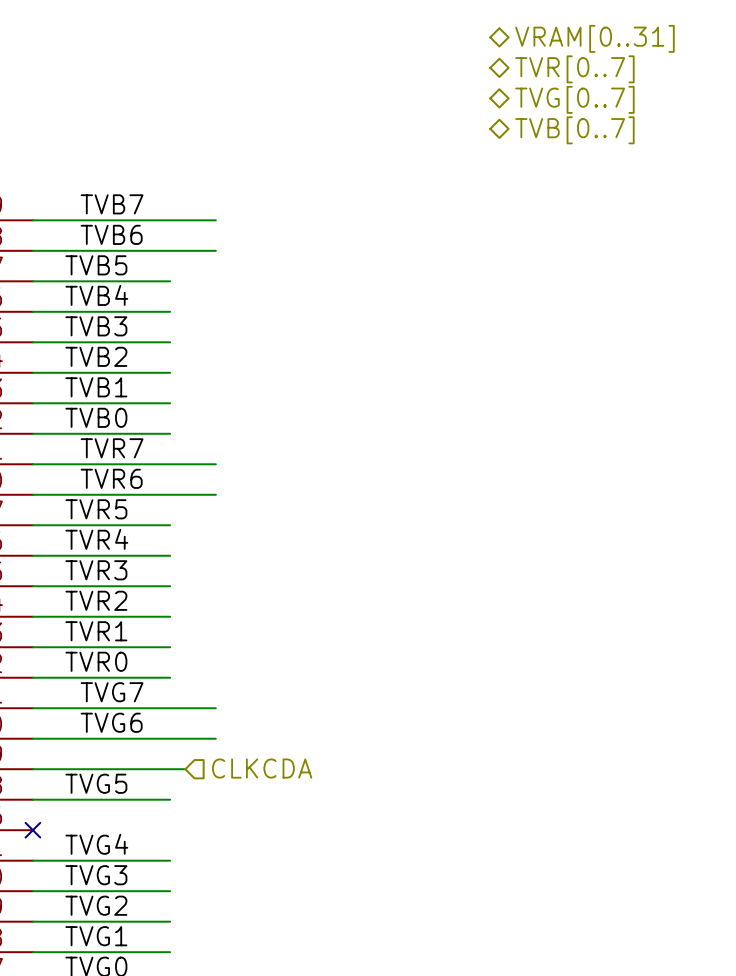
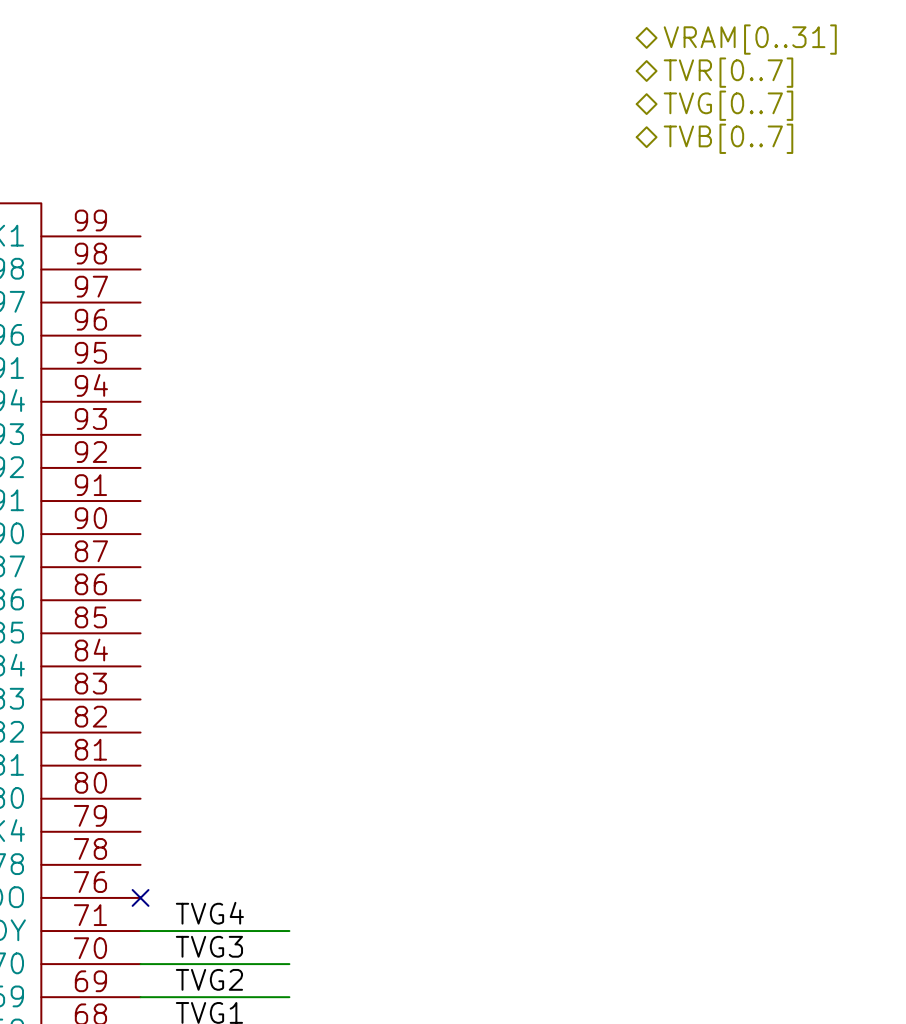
label: TVB7 (112, 204) -> none
wire: (32, 220) (215, 220) -> none
label: TVB6 (111, 234) -> none
wire: (32, 250) (215, 250) -> none
label: TVB5 (96, 265) -> none
wire: (32, 281) (170, 281) -> none
label: TVB4 (96, 295) -> none
wire: (32, 311) (170, 311) -> none
label: TVB3 (96, 326) -> none
wire: (32, 342) (170, 342) -> none
label: TVB2 (96, 356) -> none
wire: (32, 372) (170, 372) -> none
label: TVB1 (96, 387) -> none
wire: (32, 403) (170, 403) -> none
label: TVB0 (96, 417) -> none
wire: (32, 433) (170, 433) -> none
label: TVR7 (112, 448) -> none
wire: (32, 464) (215, 464) -> none
label: TVR6 (111, 478) -> none
wire: (32, 494) (215, 494) -> none
label: TVR5 (96, 509) -> none
wire: (32, 525) (170, 525) -> none
label: TVR4 (96, 539) -> none
wire: (32, 555) (170, 555) -> none
label: TVR3 (96, 570) -> none
wire: (32, 586) (170, 586) -> none
label: TVR2 (96, 600) -> none
wire: (32, 616) (170, 616) -> none
label: TVR1 (96, 631) -> none
wire: (32, 647) (170, 647) -> none
label: TVR0 (96, 661) -> none
wire: (32, 677) (170, 677) -> none
label: TVG7 (112, 692) -> none
wire: (32, 708) (215, 708) -> none
label: TVG6 (111, 722) -> none
wire: (32, 738) (215, 738) -> none
hierarchical label: CLKCDA (262, 768) -> none
wire: (32, 769) (185, 769) -> none
label: TVG5 (96, 783) -> none
wire: (32, 799) (170, 799) -> none

